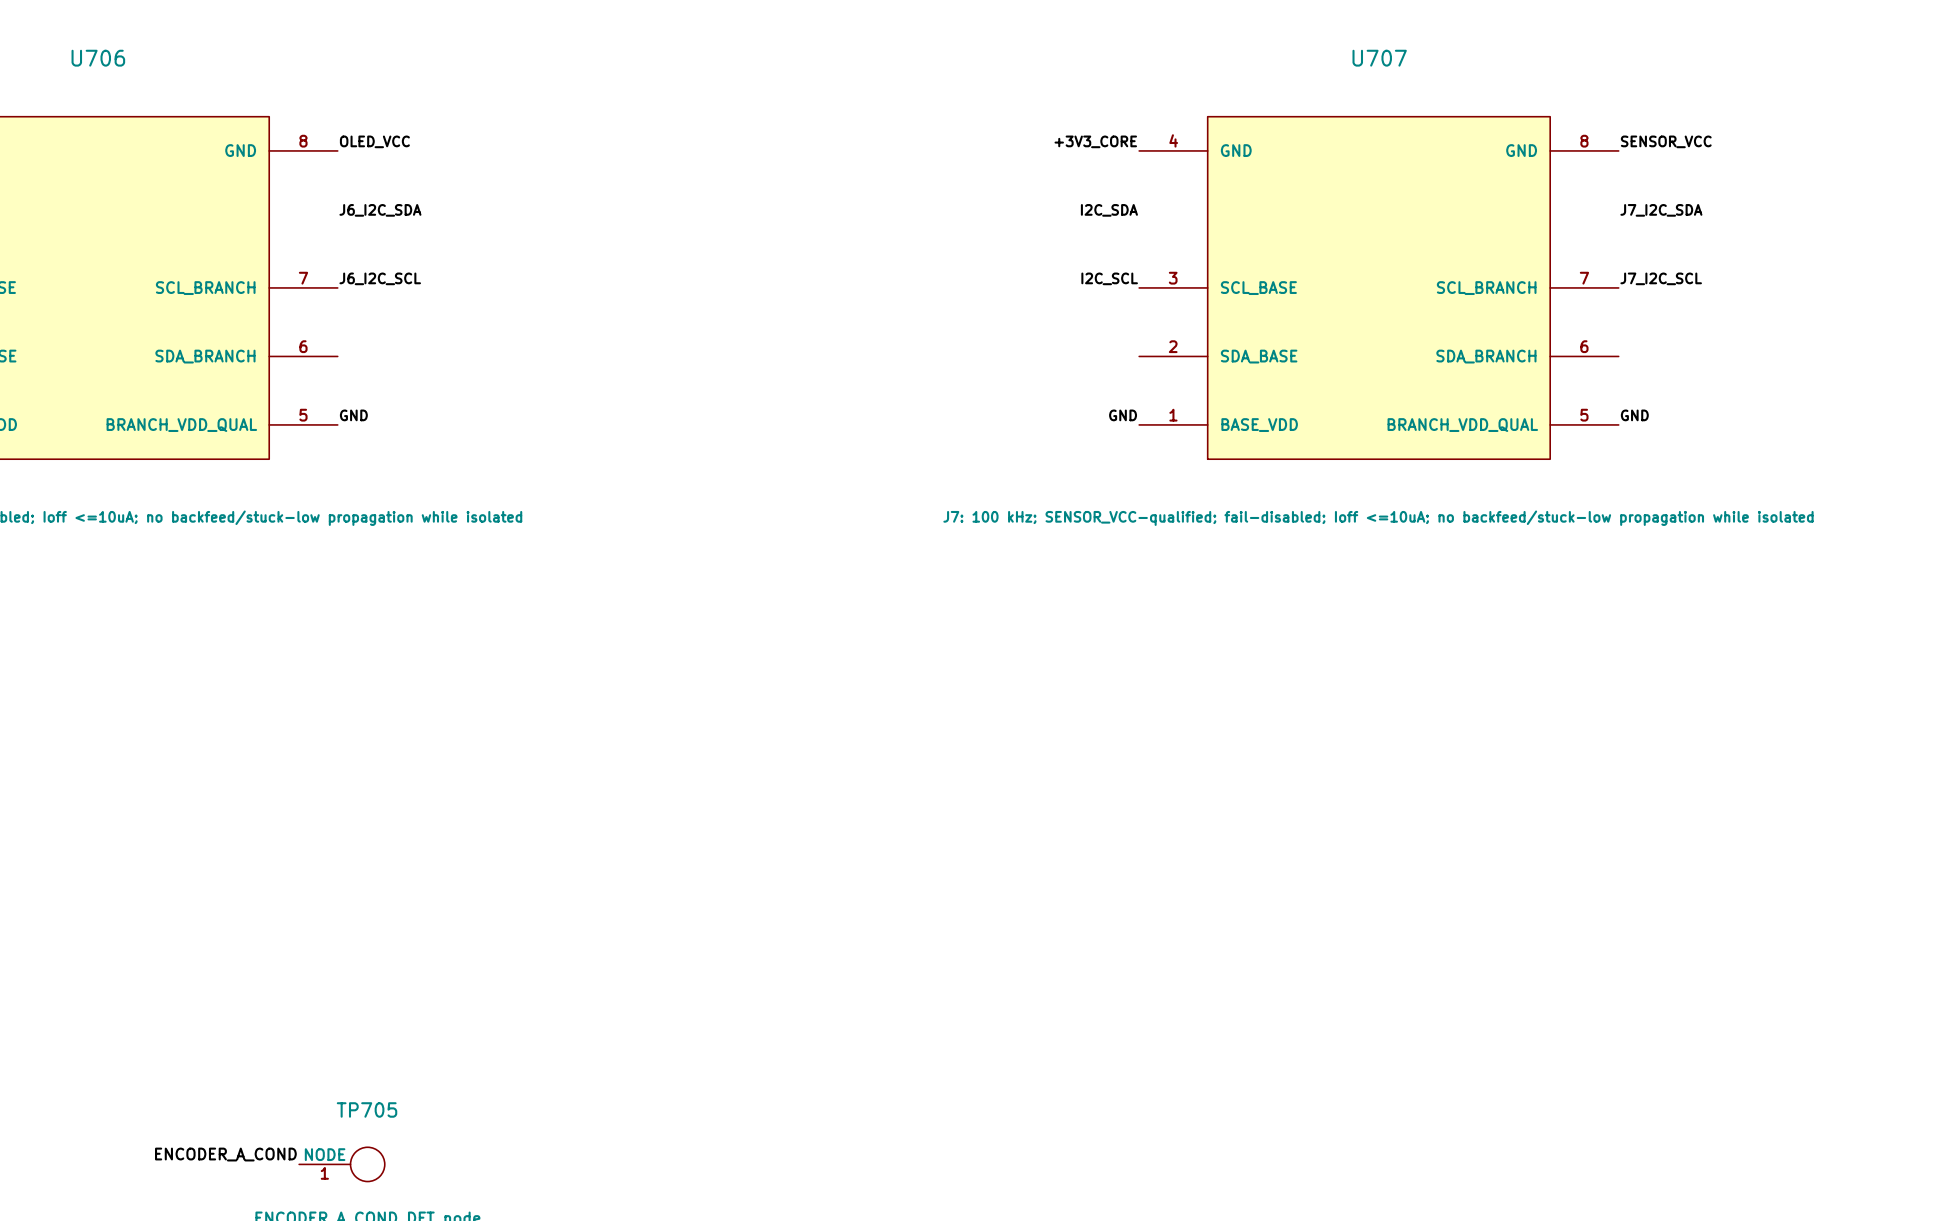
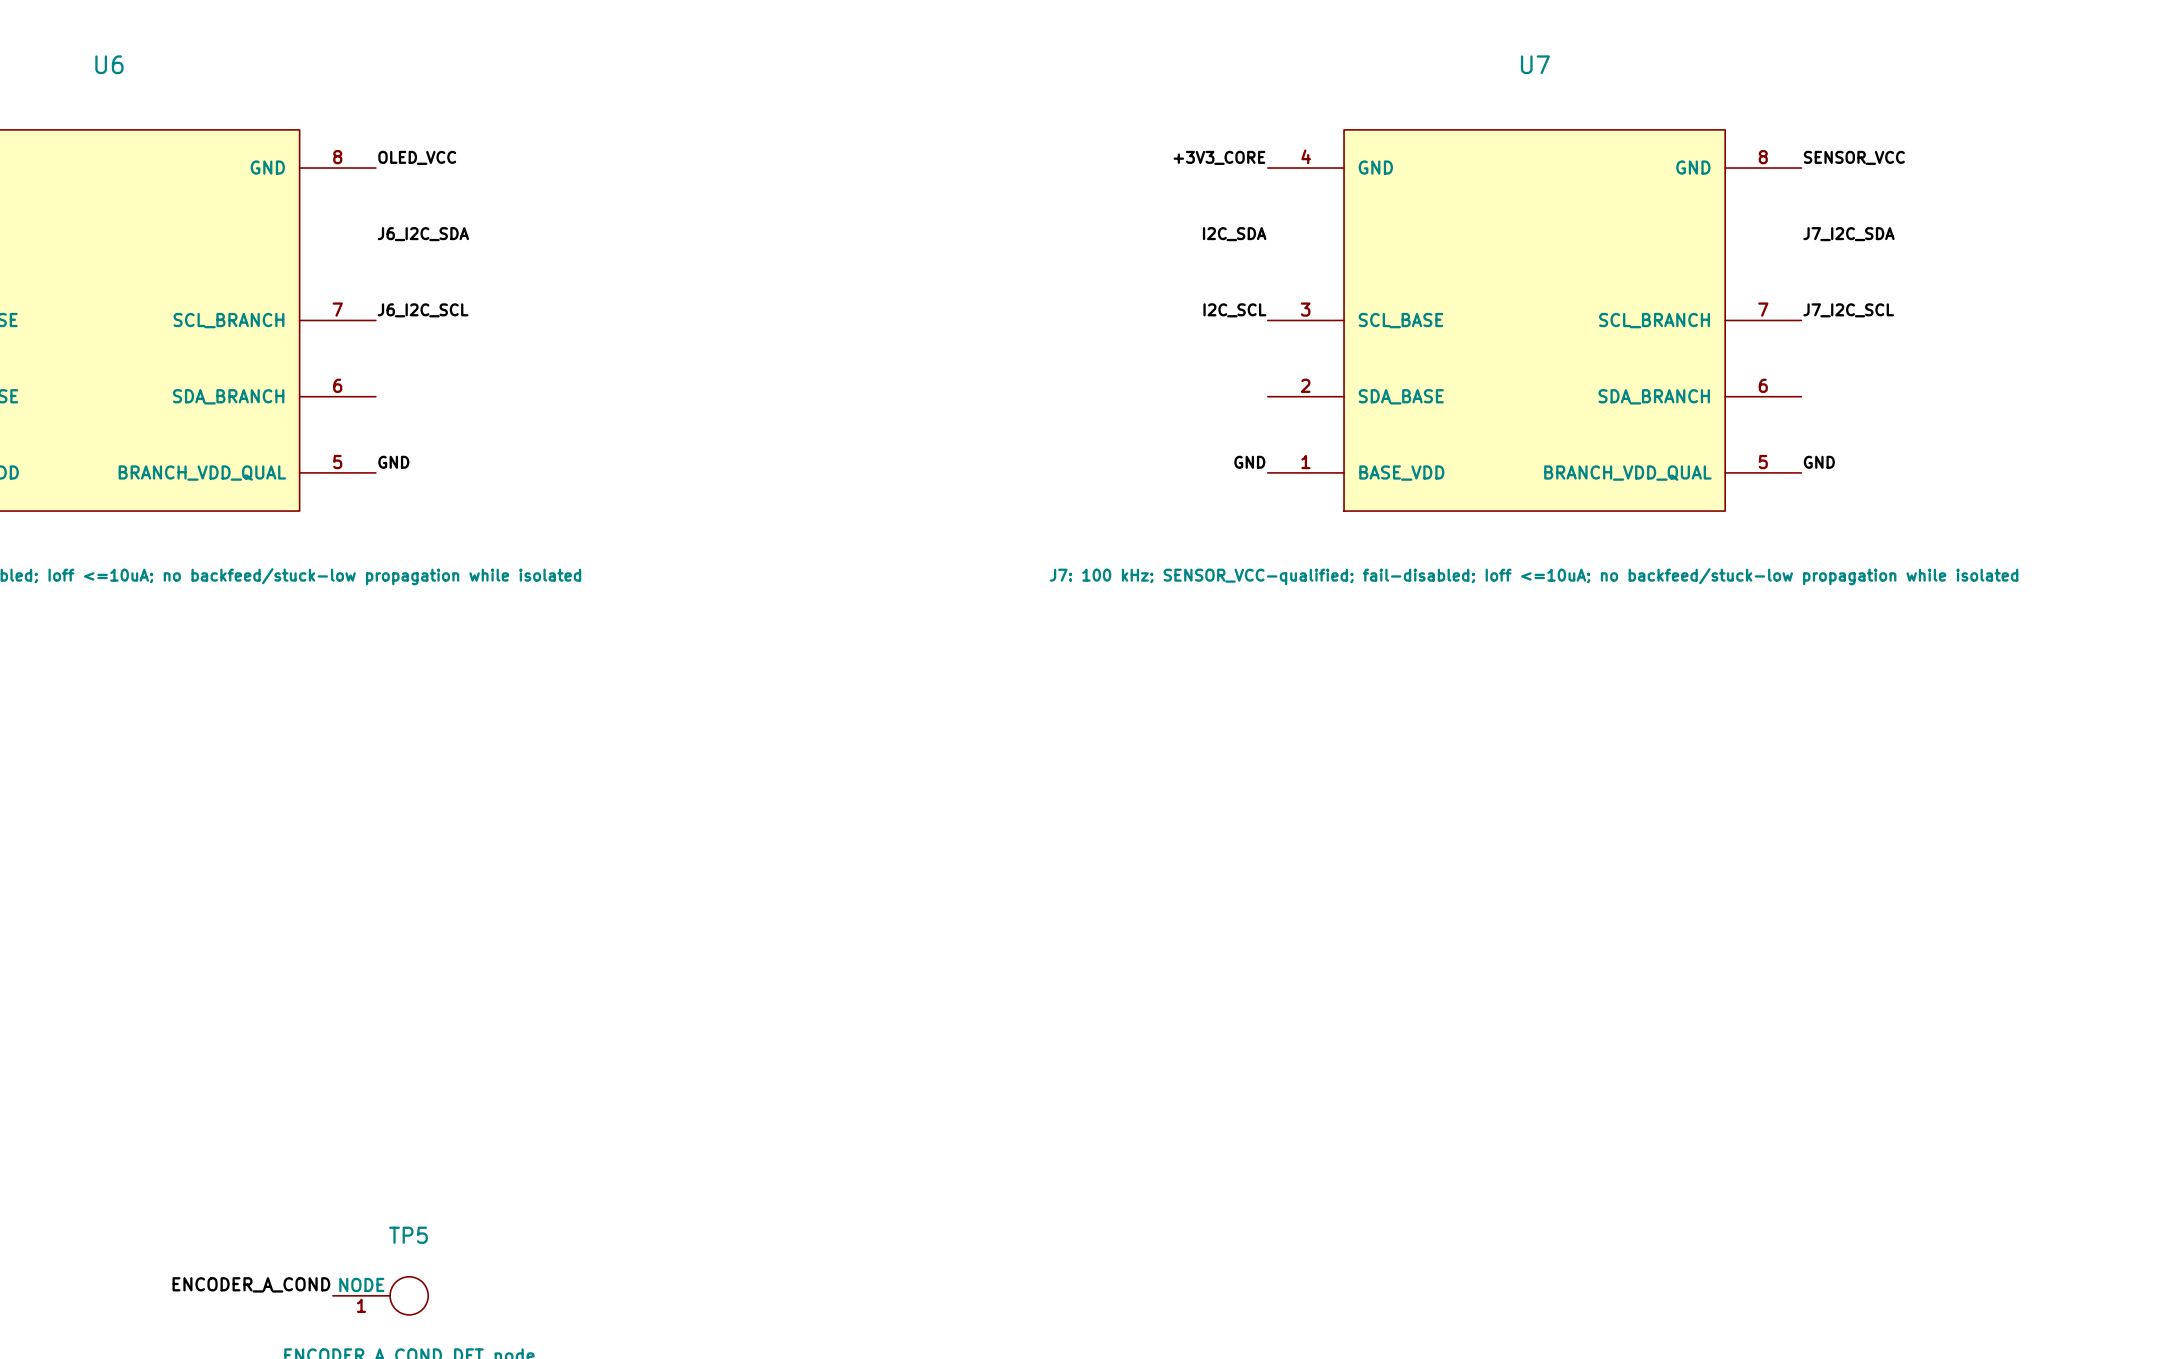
U706 name: U706 (98, 58) -> U6 (109, 64)
U707 name: U707 (1379, 58) -> U7 (1535, 64)
TP705 name: TP705 (367, 1109) -> TP5 (408, 1235)

